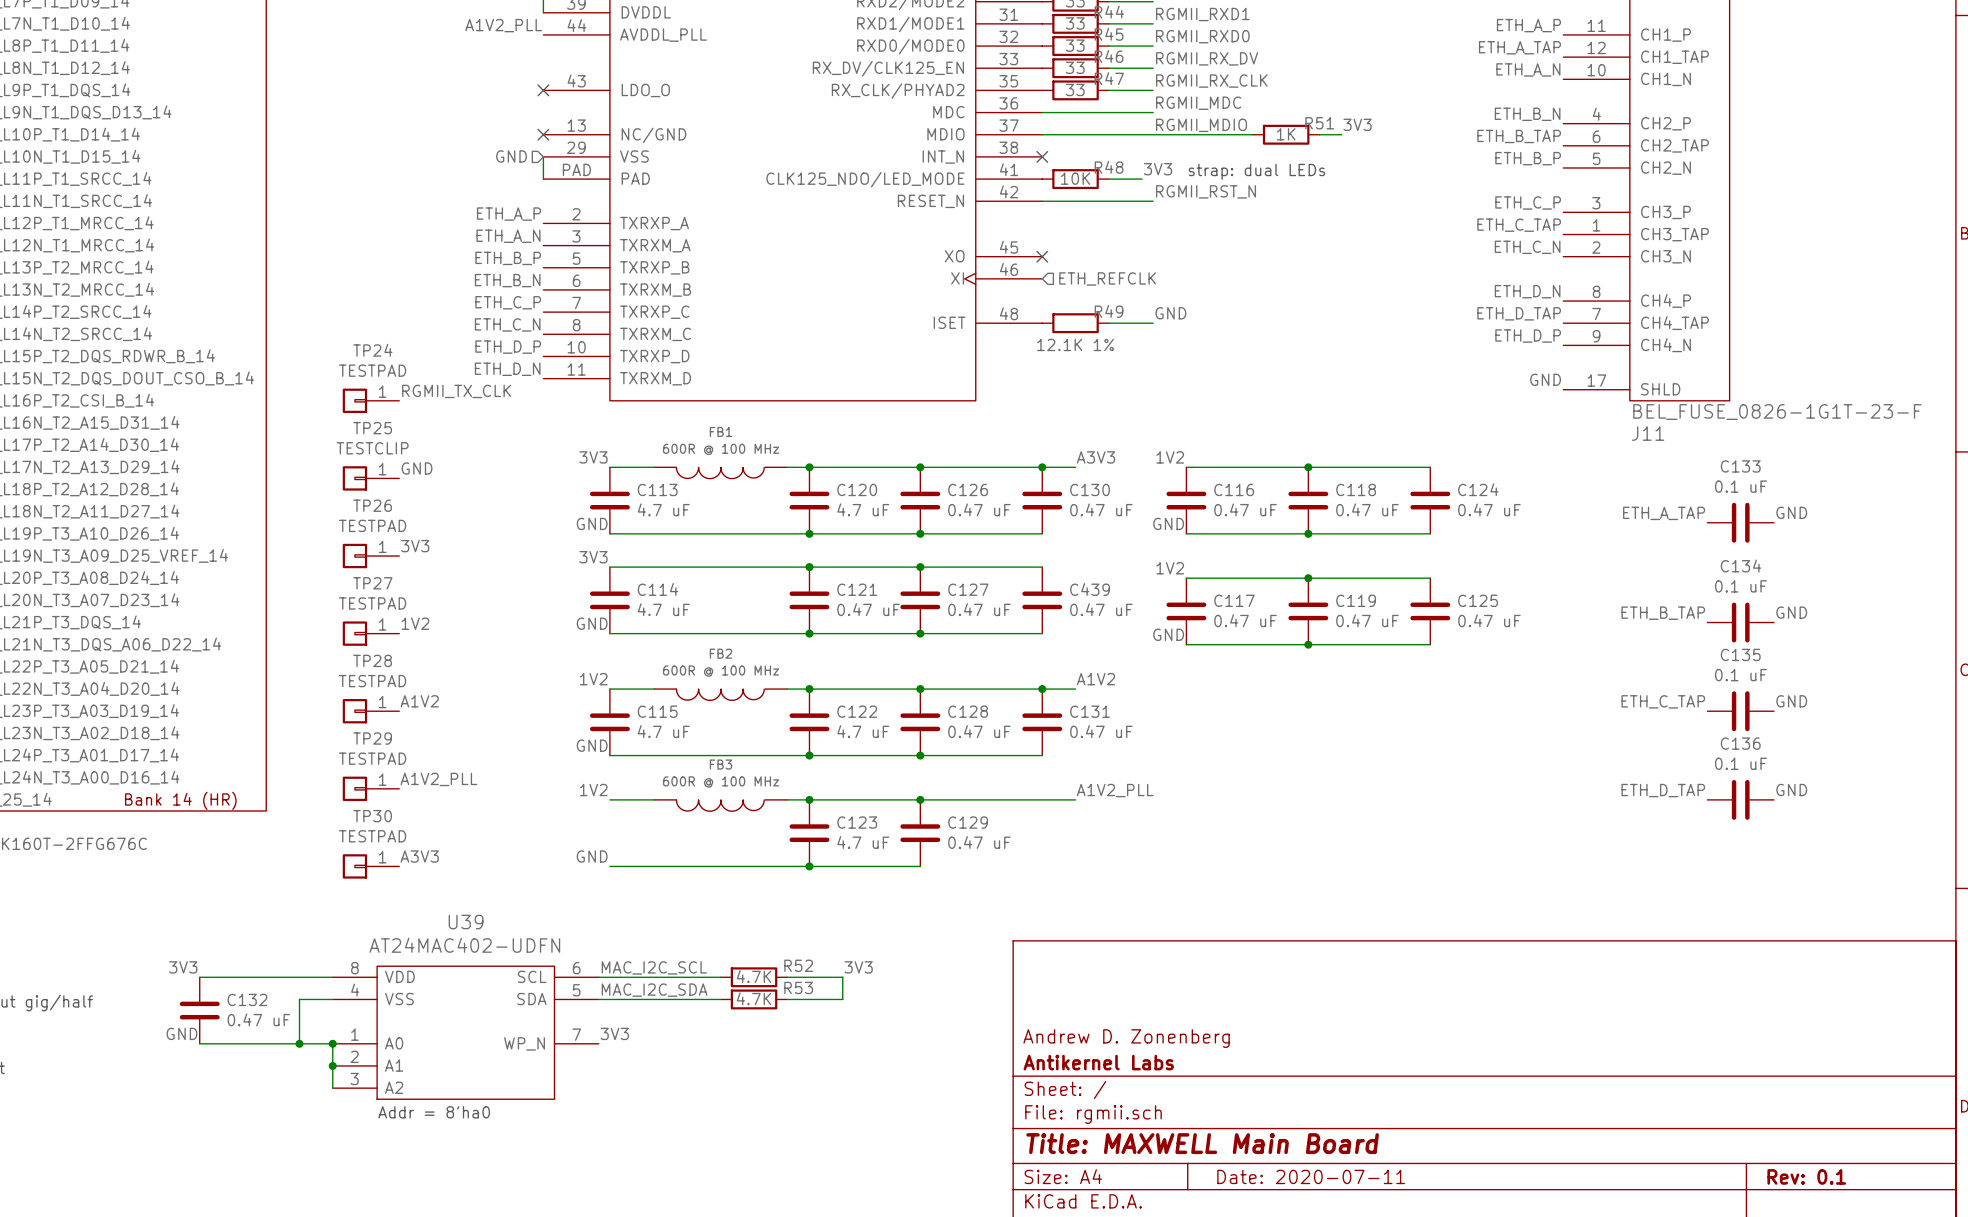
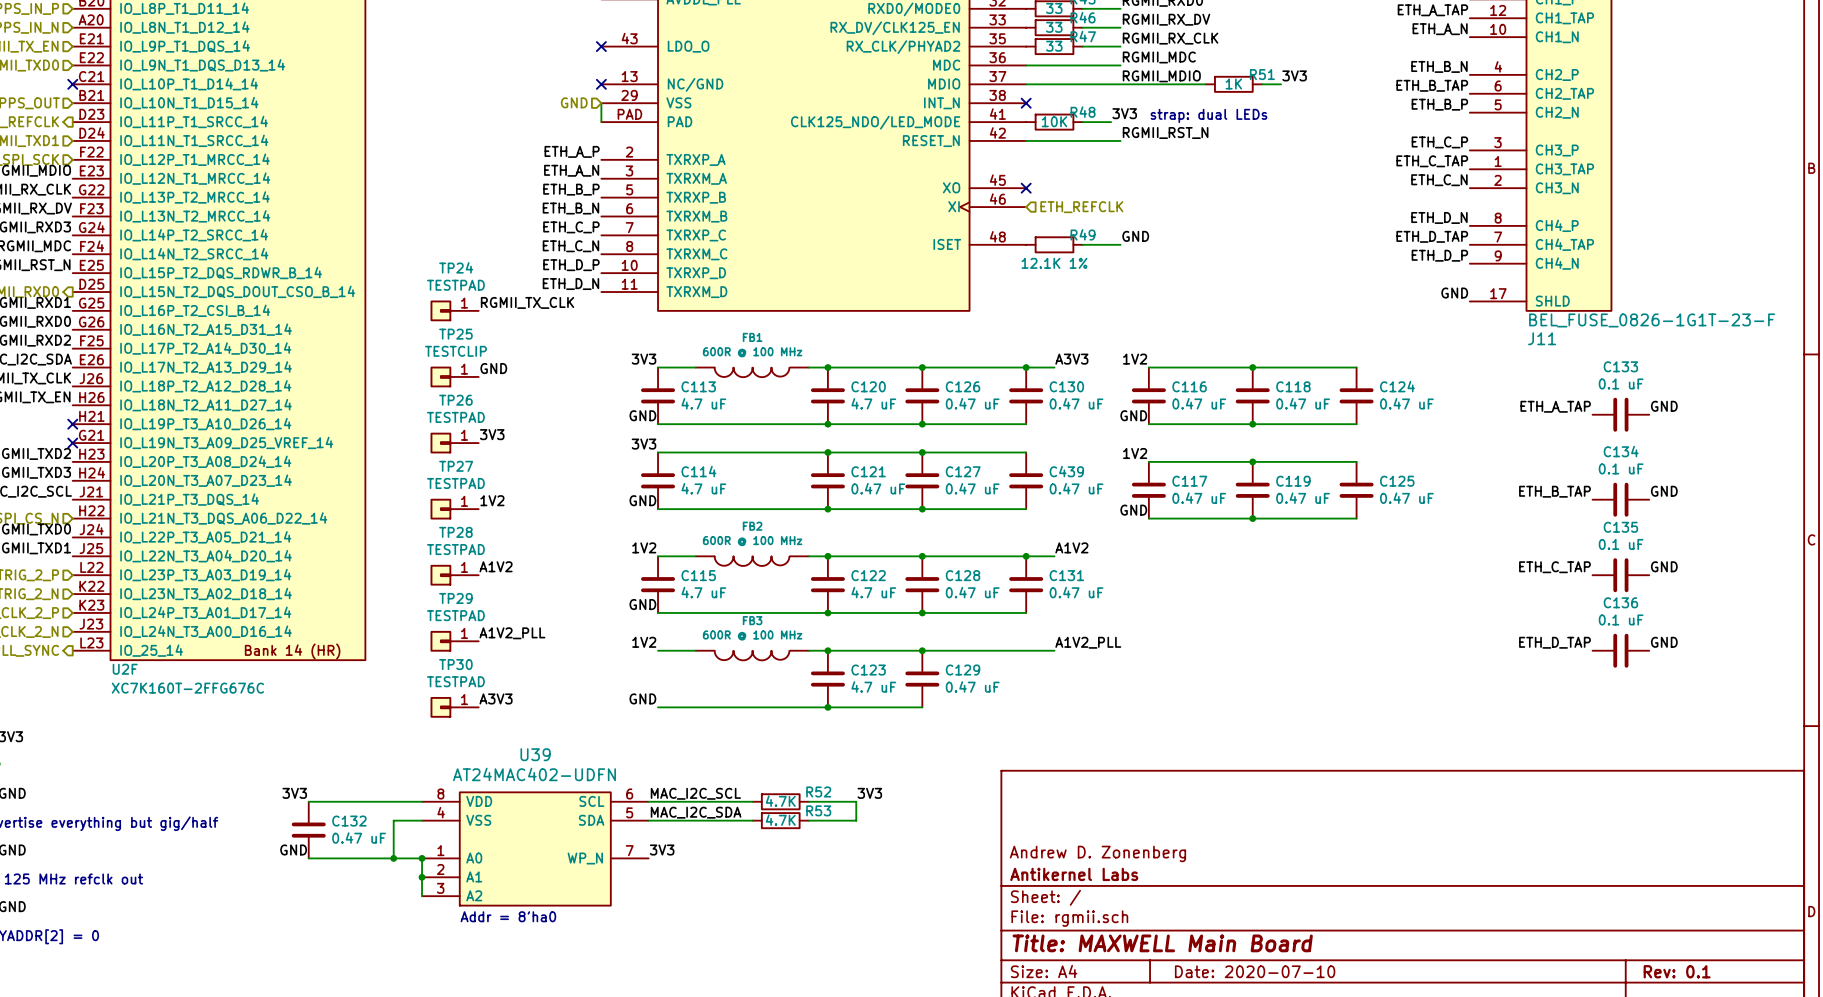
title block: Date: 2020-07-11 (1311, 1176) -> Date: 2020-07-10 (1255, 971)

